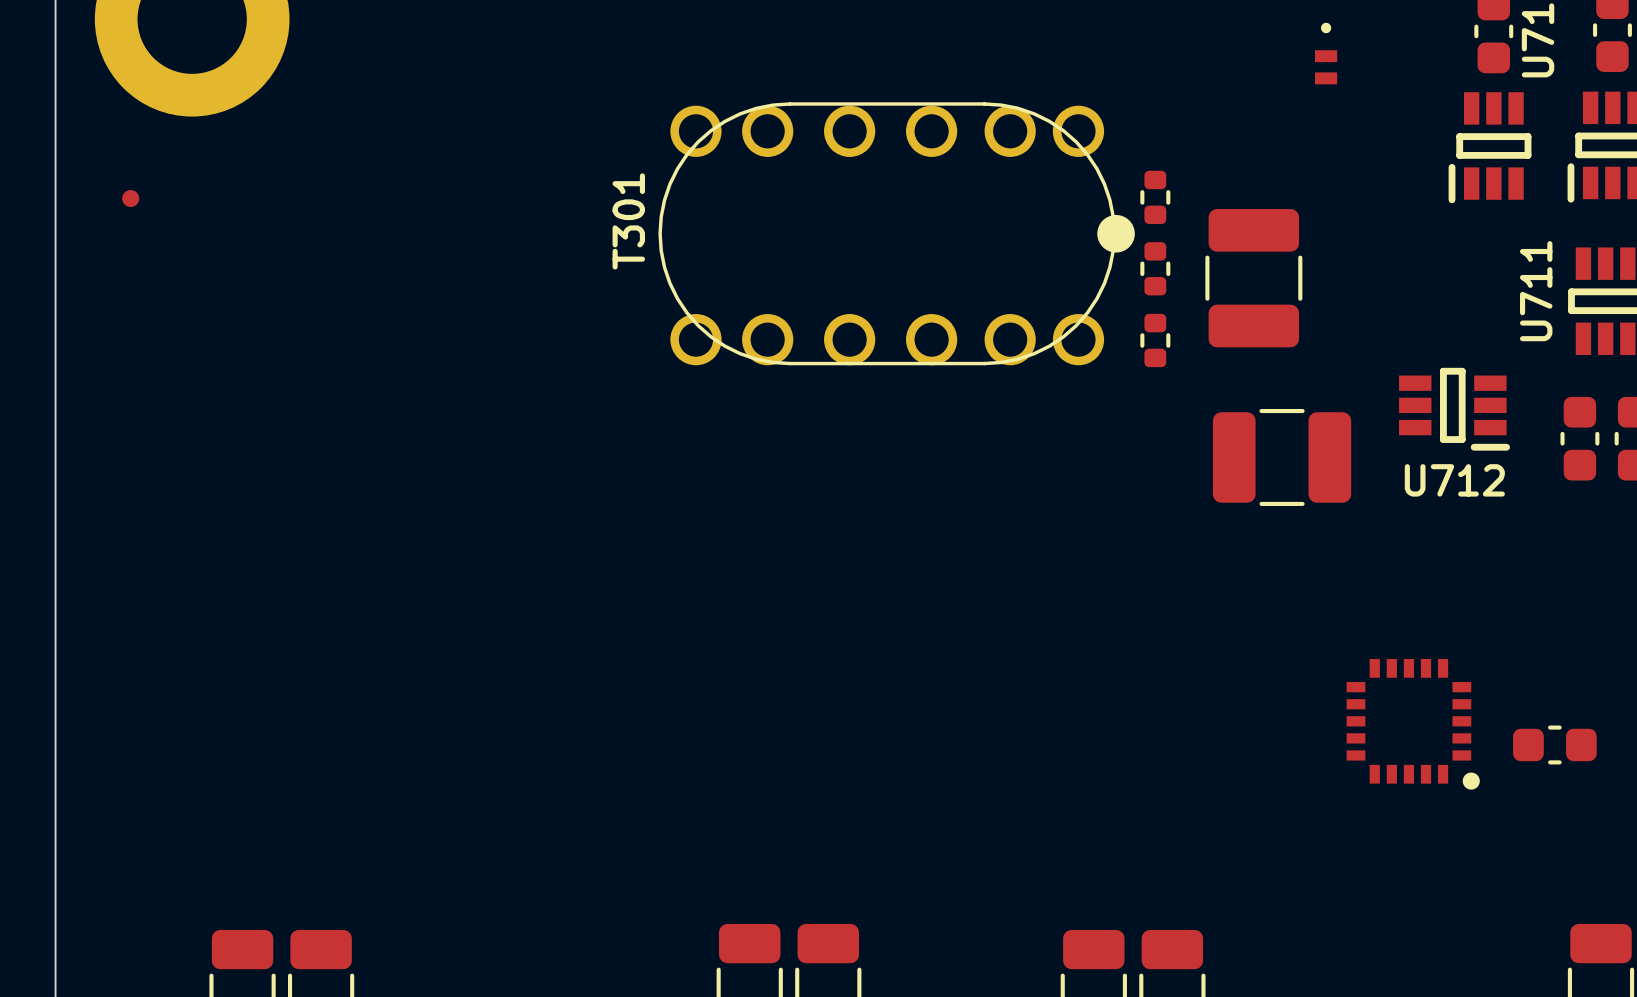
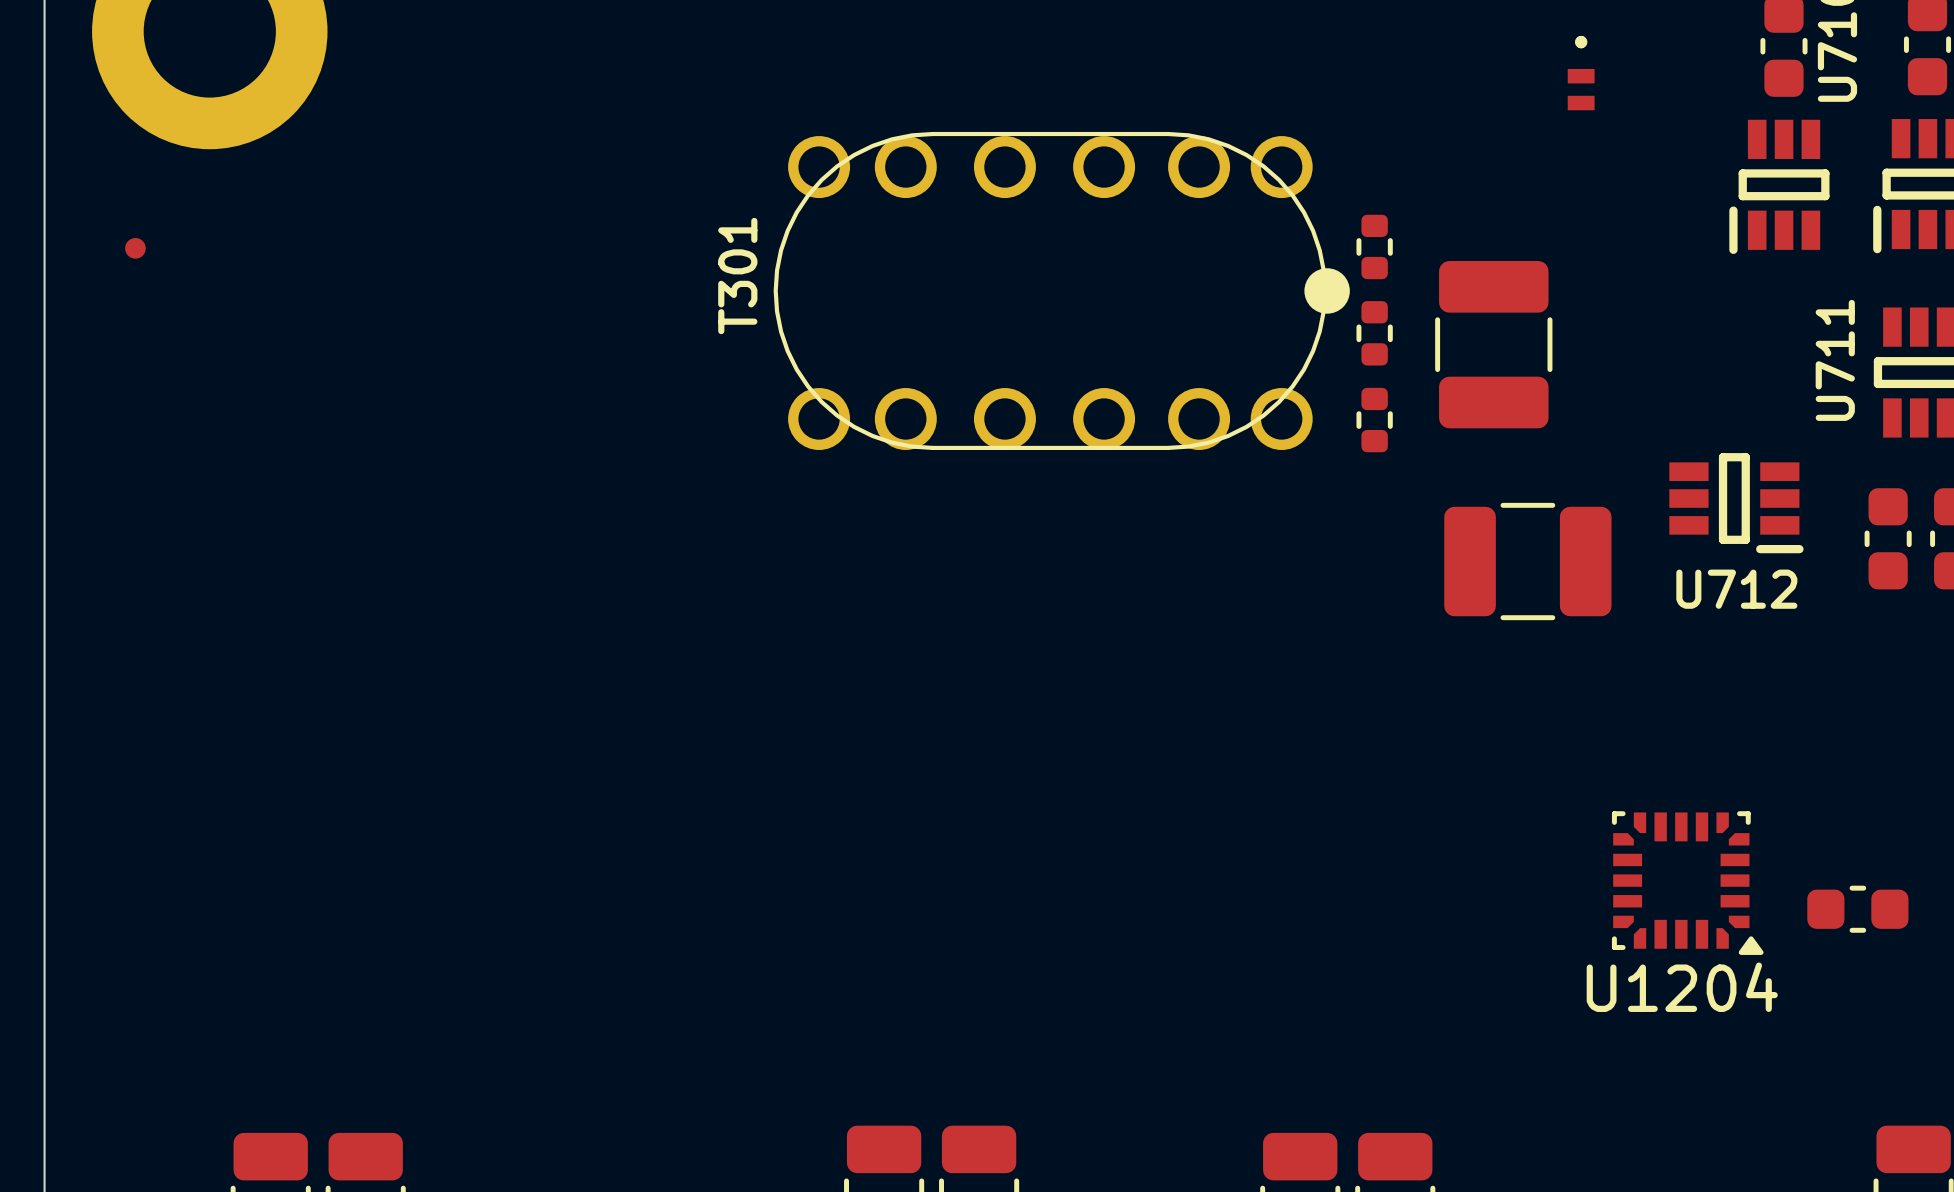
U1204: none -> (1687, 883)
part: (1413, 724) -> none

